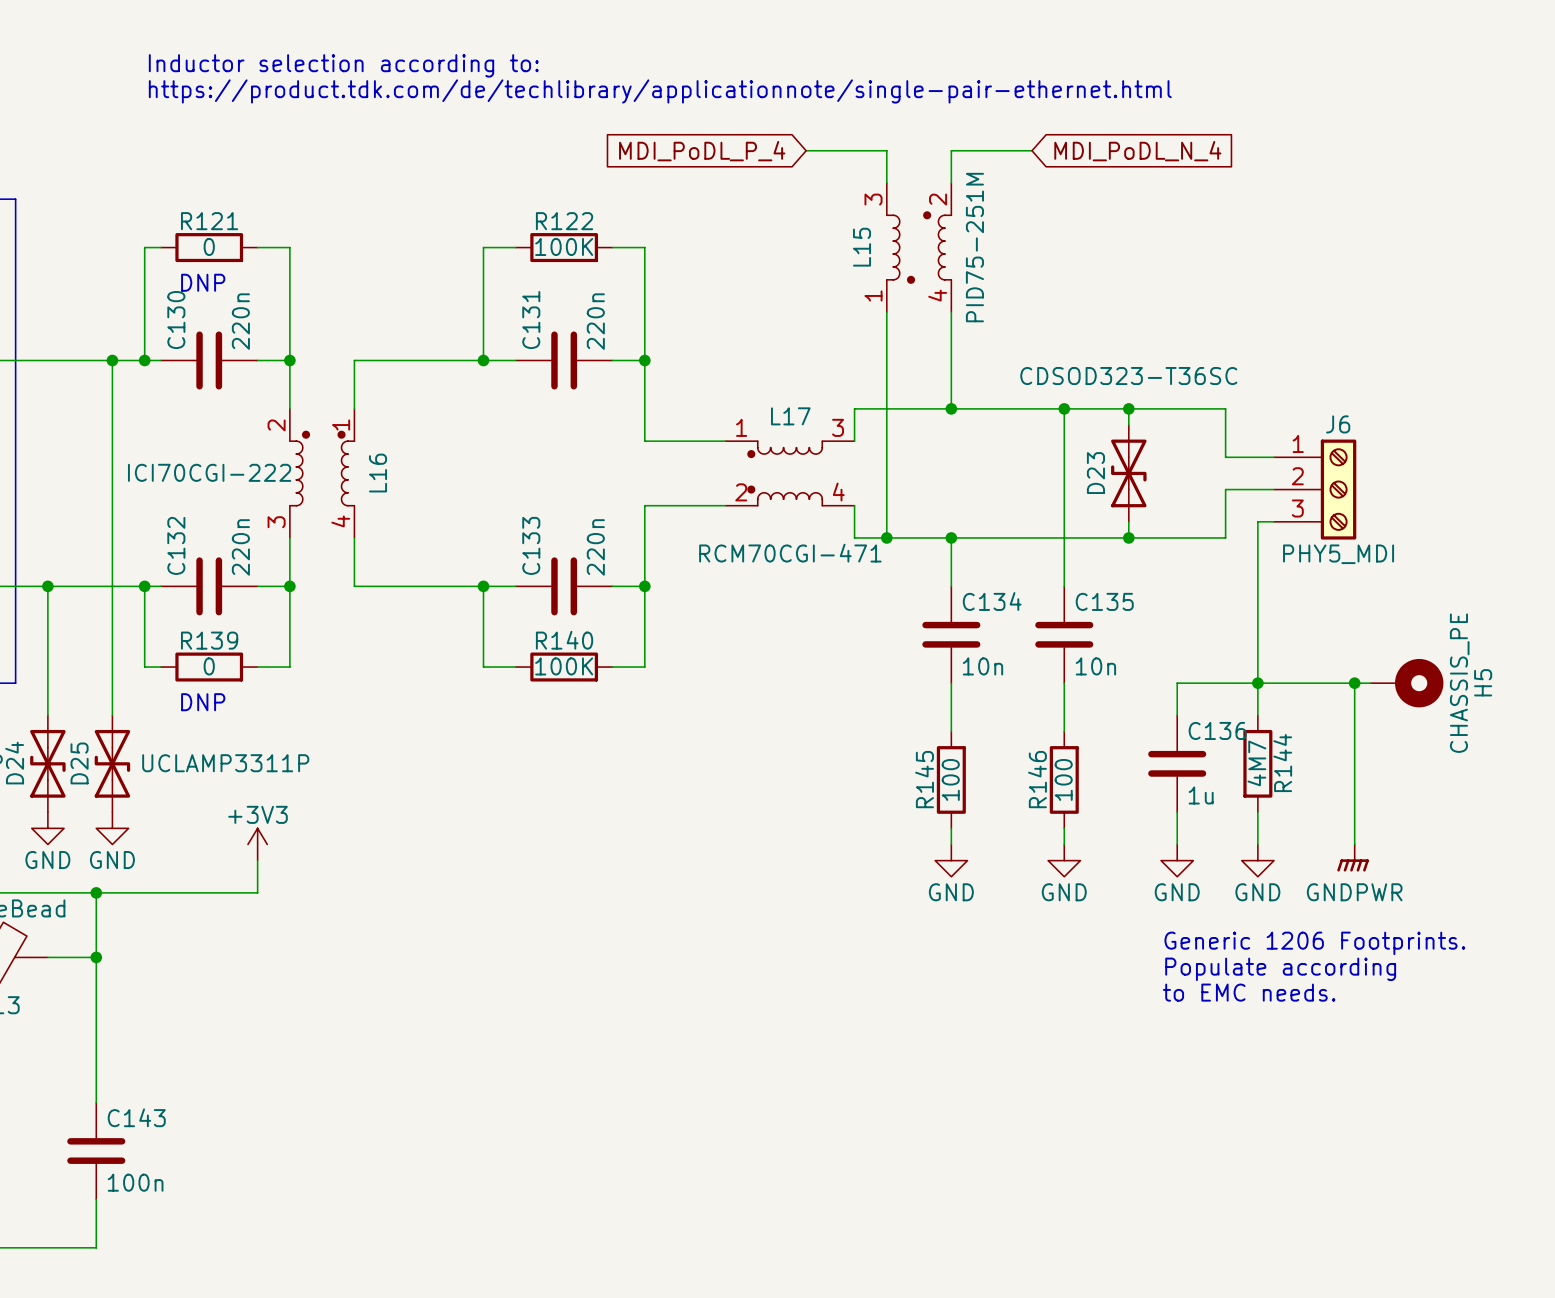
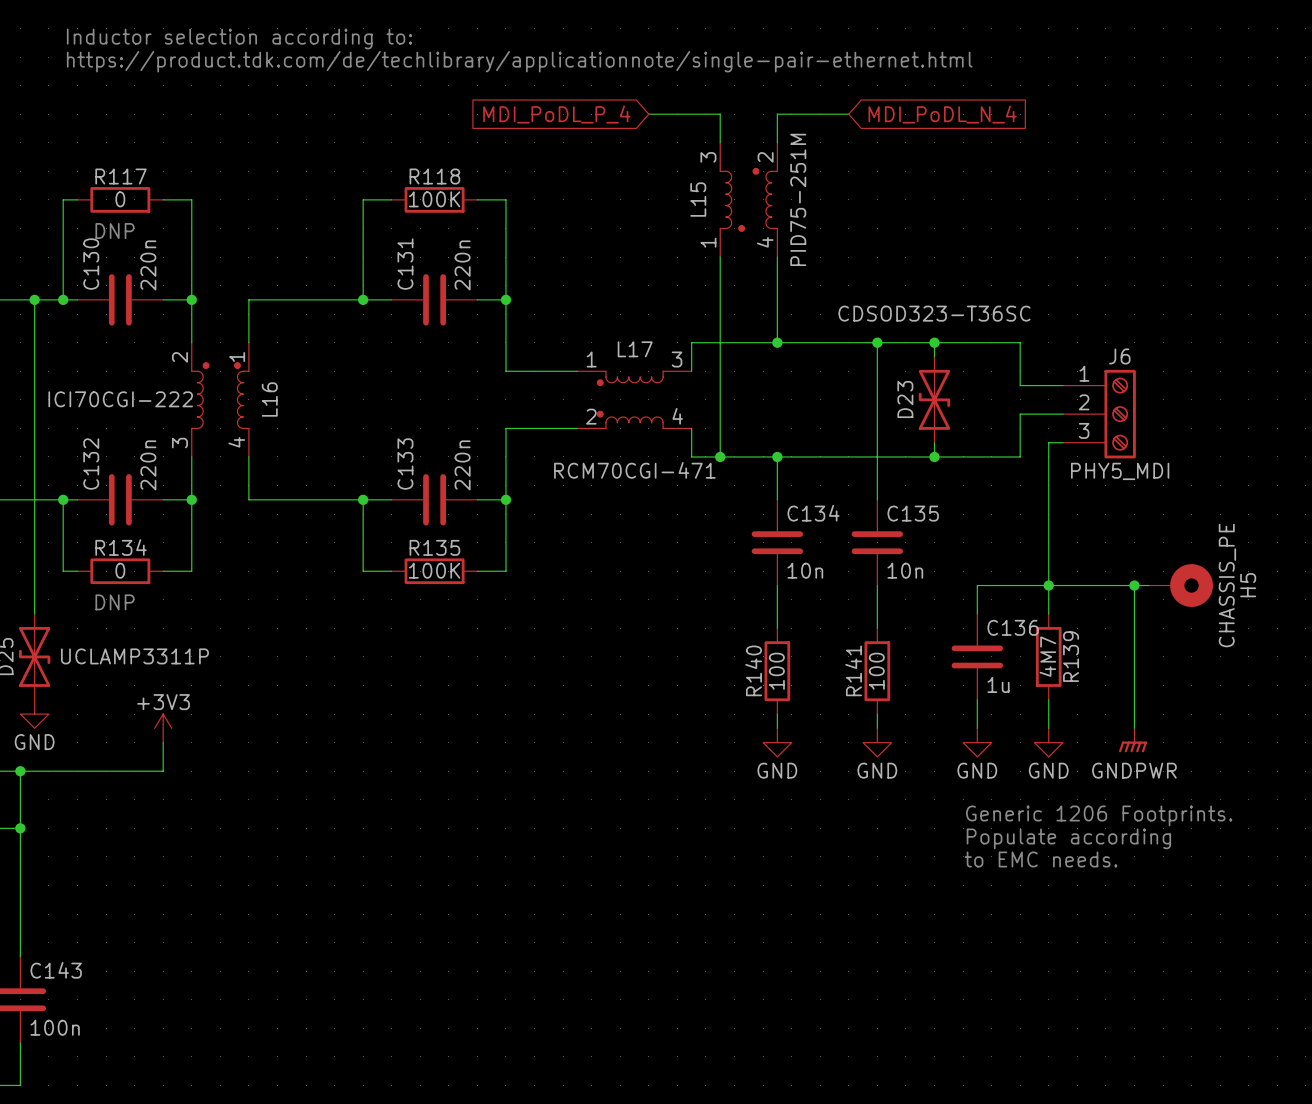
R121 name: R121 (209, 221) -> R117 (121, 176)
R122 name: R122 (564, 221) -> R118 (434, 176)
R139 name: R139 (209, 640) -> R134 (121, 547)
R140 name: R140 (564, 640) -> R135 (434, 547)
R144 name: R144 (1282, 763) -> R139 (1071, 656)
R145 name: R145 (924, 779) -> R140 (753, 670)
R146 name: R146 (1037, 779) -> R141 (853, 670)

